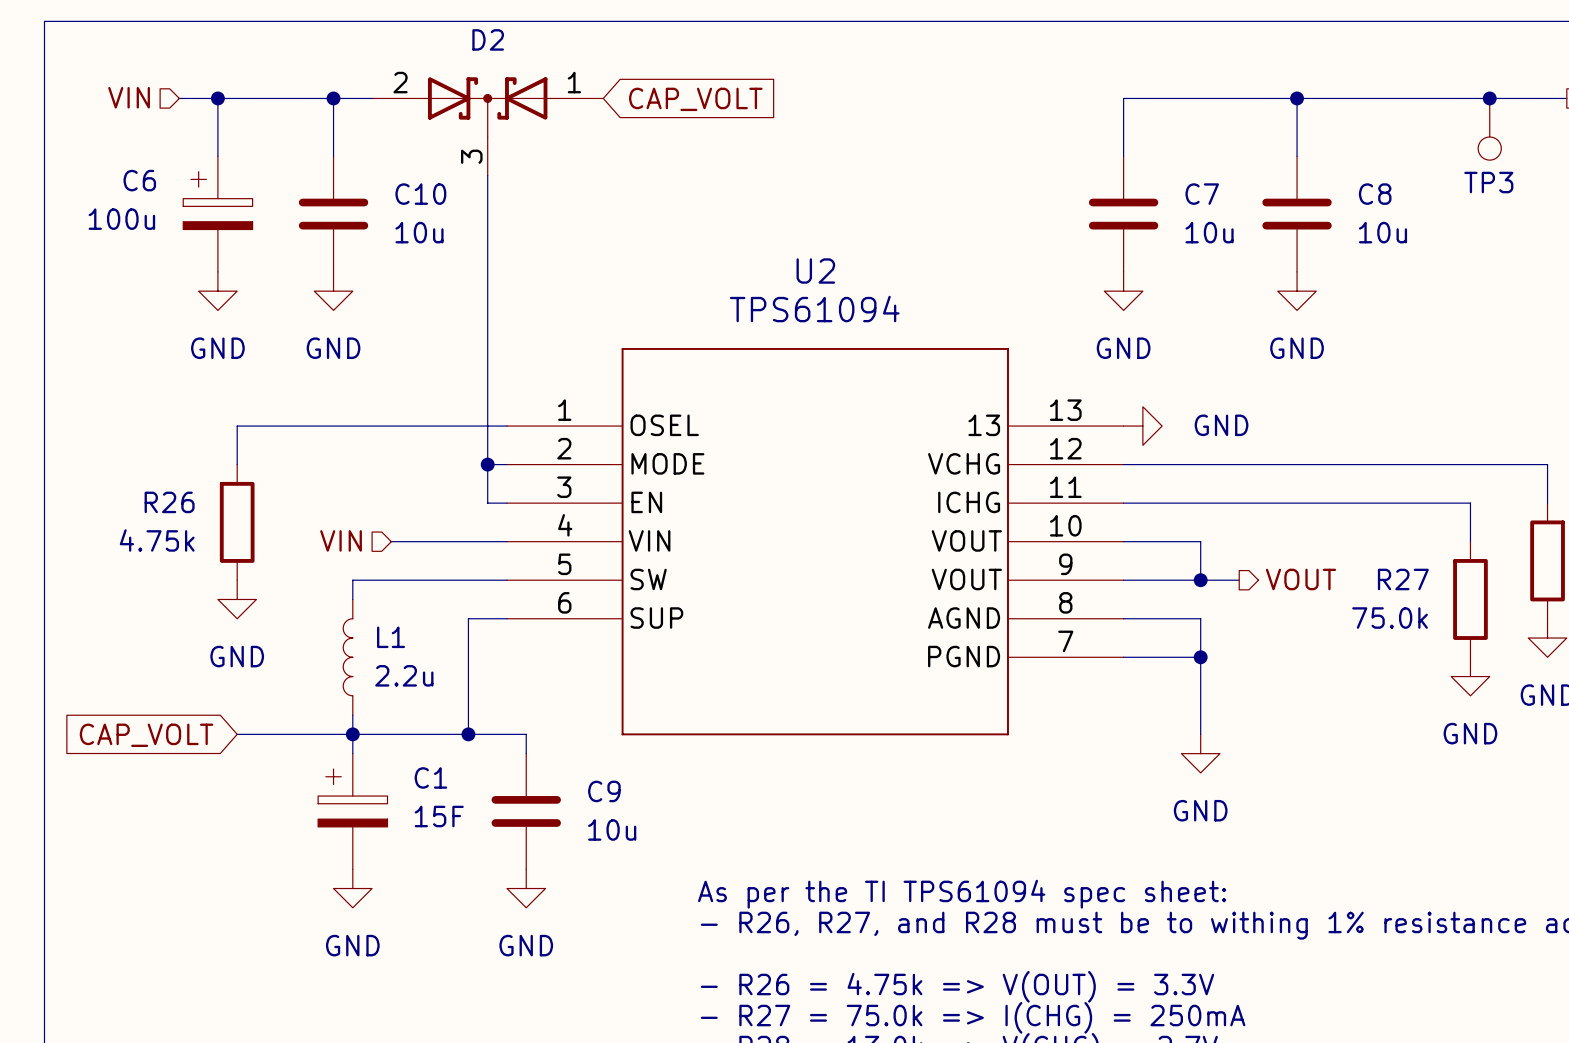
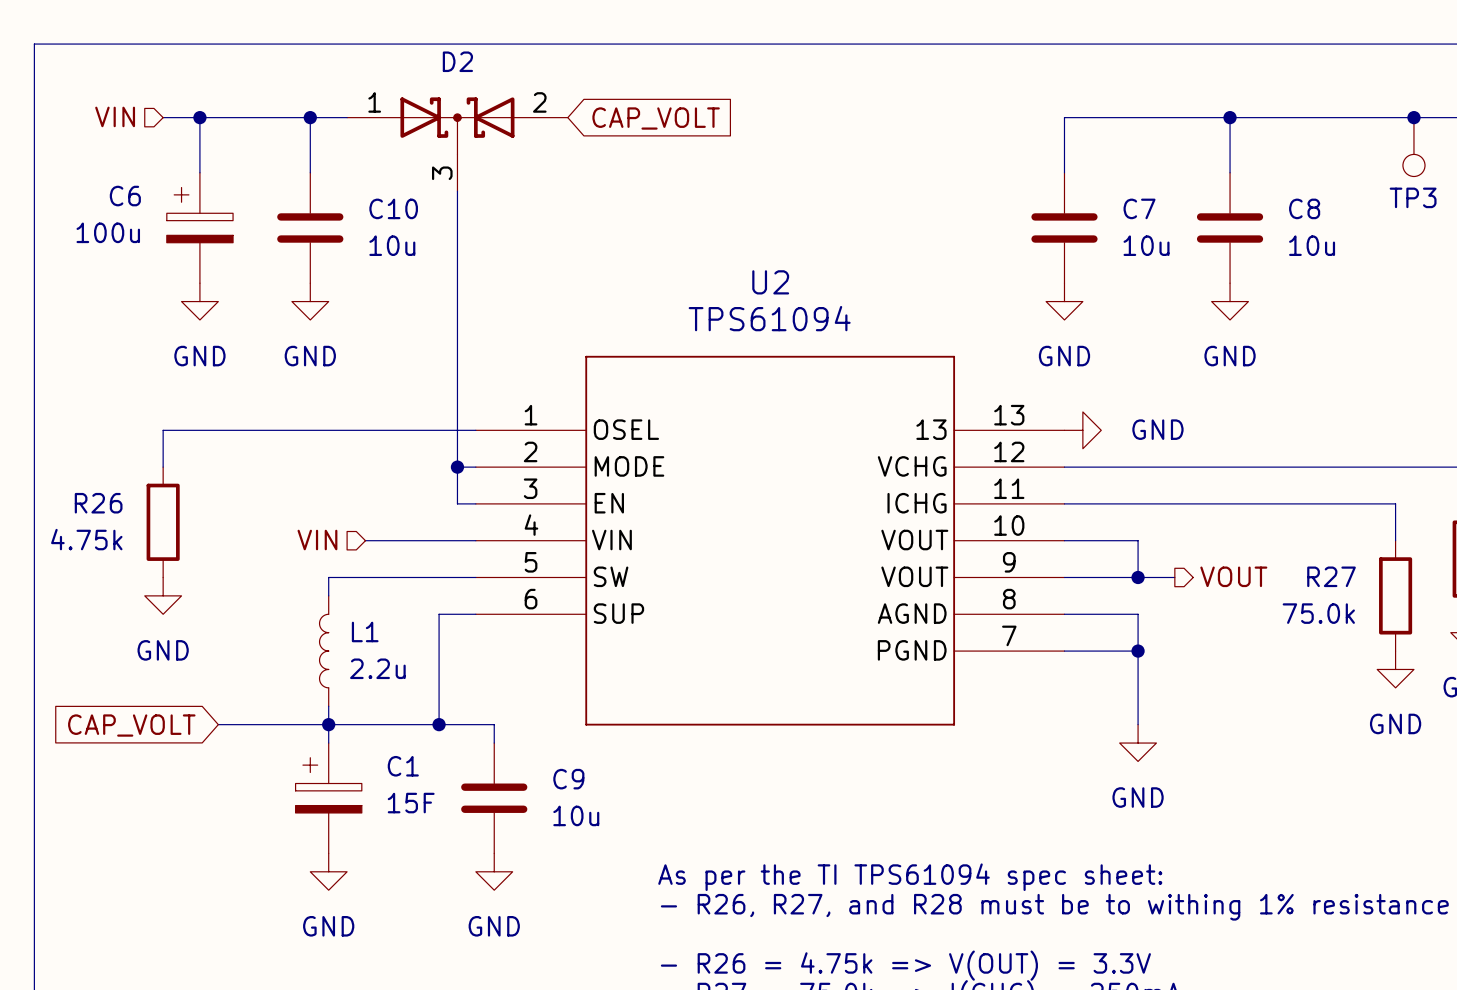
D2 flip: as is (487, 107) -> left-right (457, 125)
wire: (237, 426) (237, 464) -> (218, 430) (163, 430) (163, 467)
R26 position: (237, 522) -> (163, 522)
power symbol position: GND (237, 599) -> GND (163, 595)

